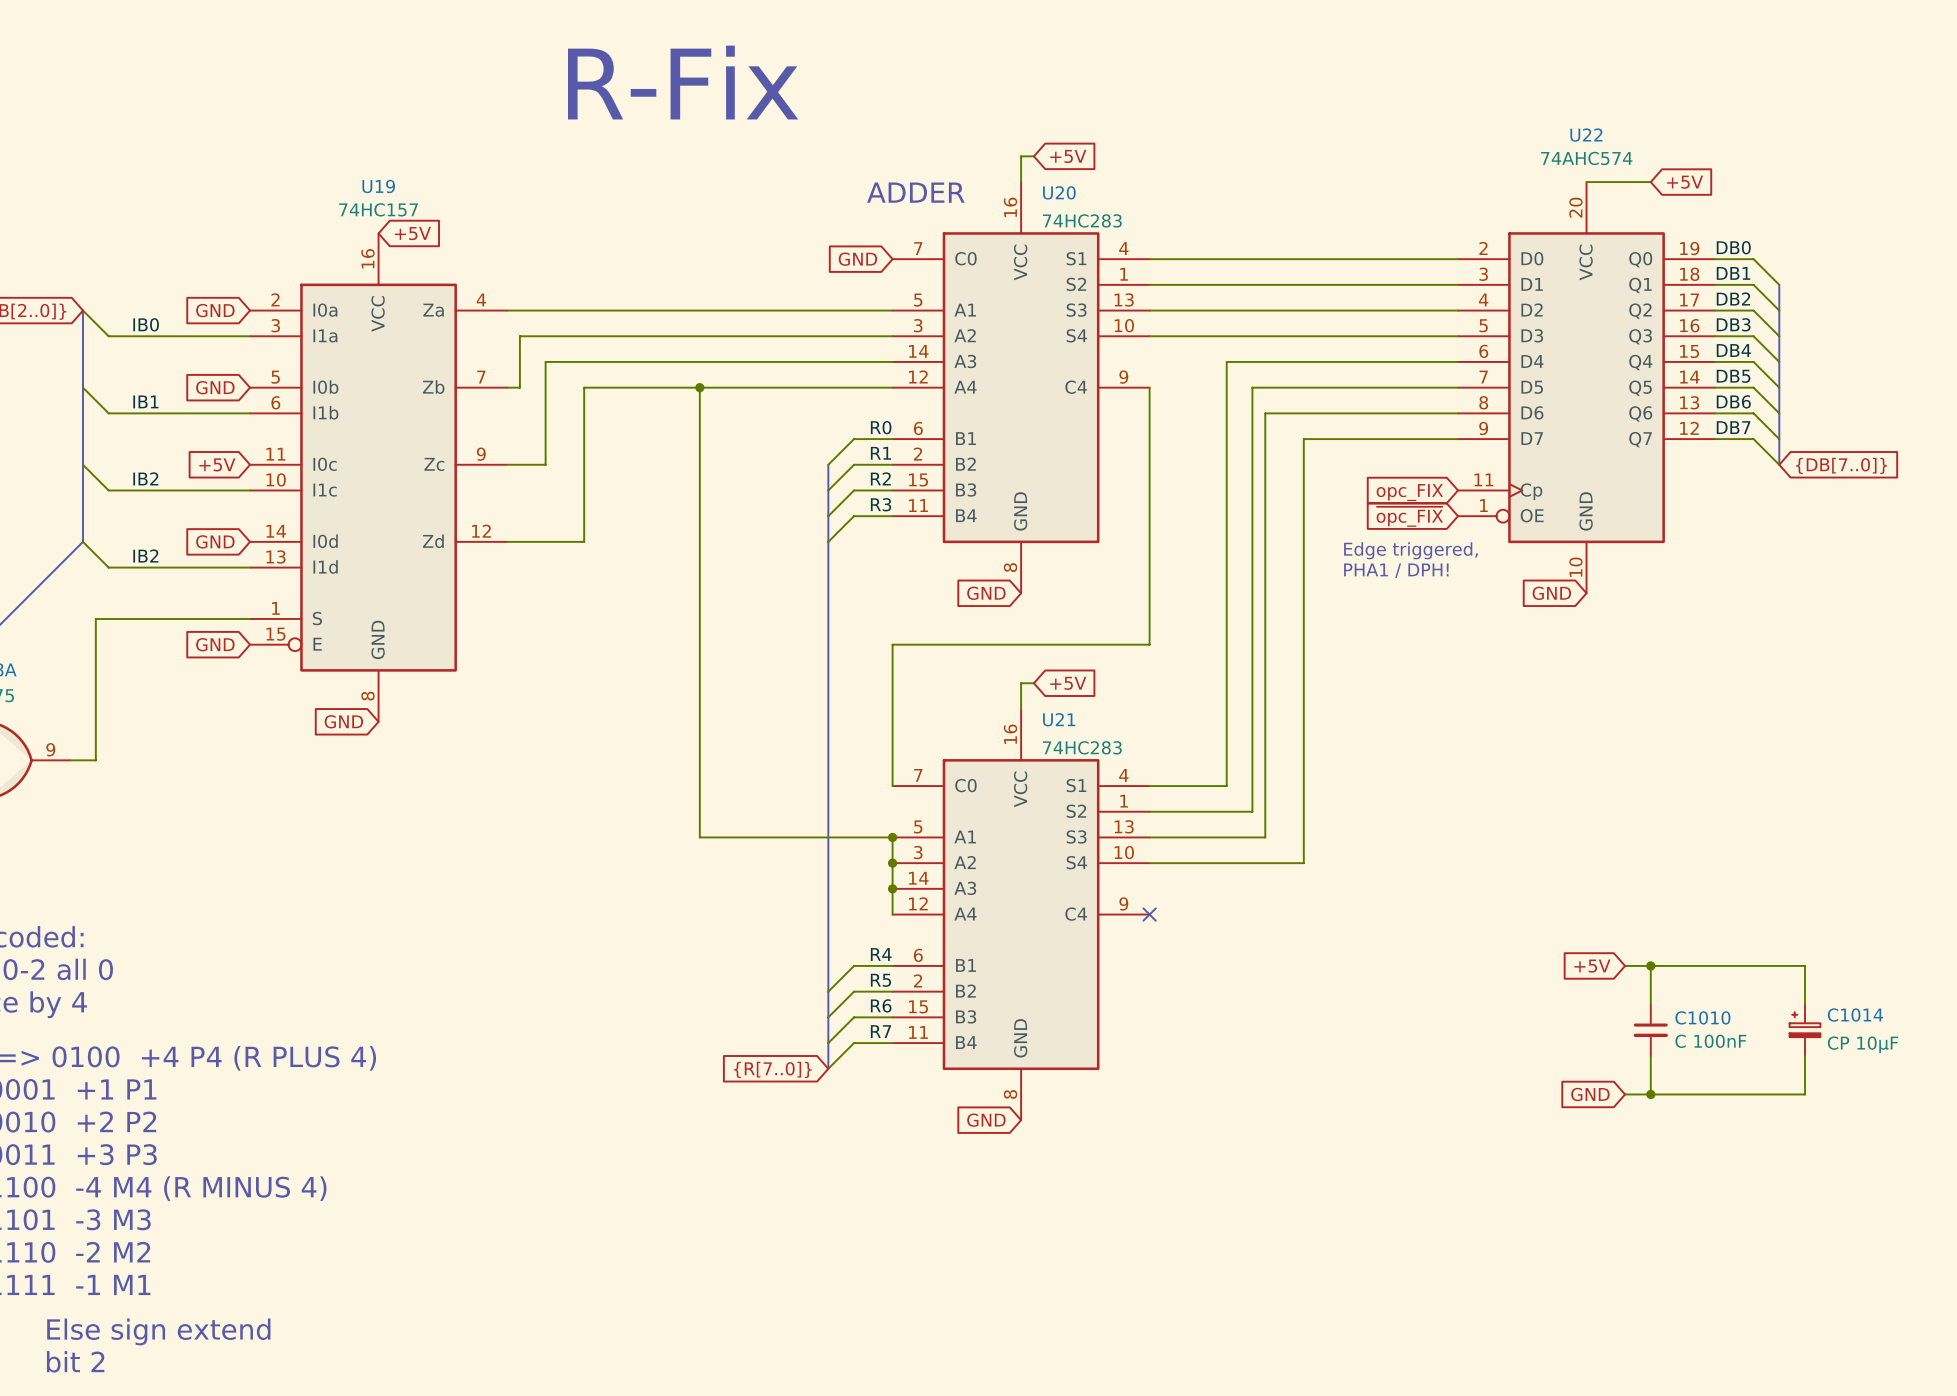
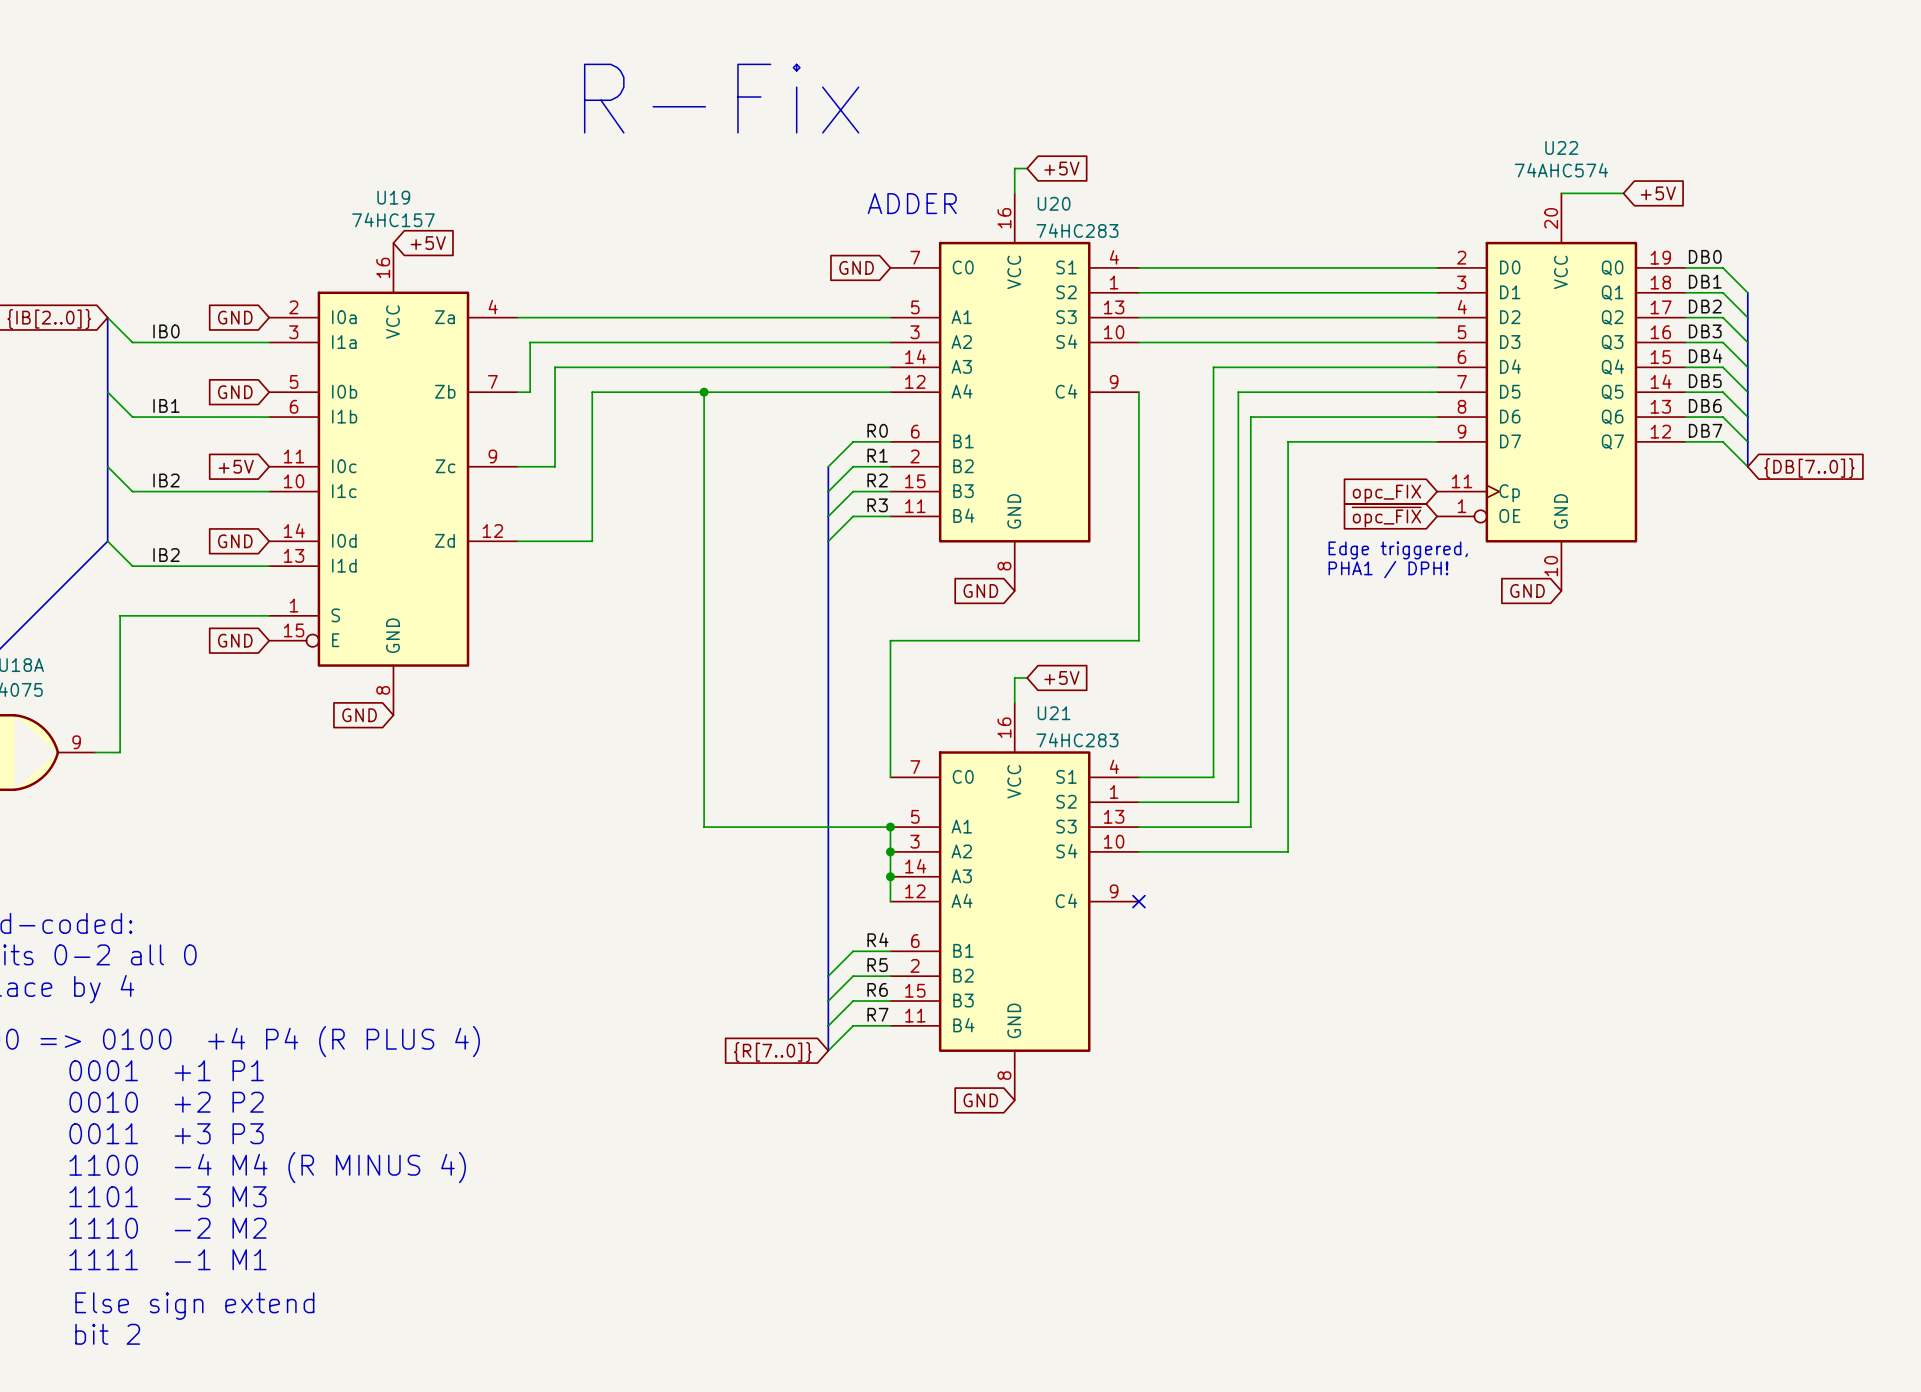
wire: (1625, 965) (1804, 965) (1804, 1004) -> none
wire: (1650, 965) (1650, 1004) -> none
junction: (1650, 965) -> none
global label: +5V (1592, 966) -> none
C1010: C 100nF (1650, 1030) -> none
C1014: CP 10μF (1804, 1030) -> none
wire: (1650, 1055) (1650, 1094) -> none
wire: (1804, 1055) (1804, 1094) (1625, 1094) -> none
global label: GND (1590, 1094) -> none
junction: (1650, 1094) -> none

